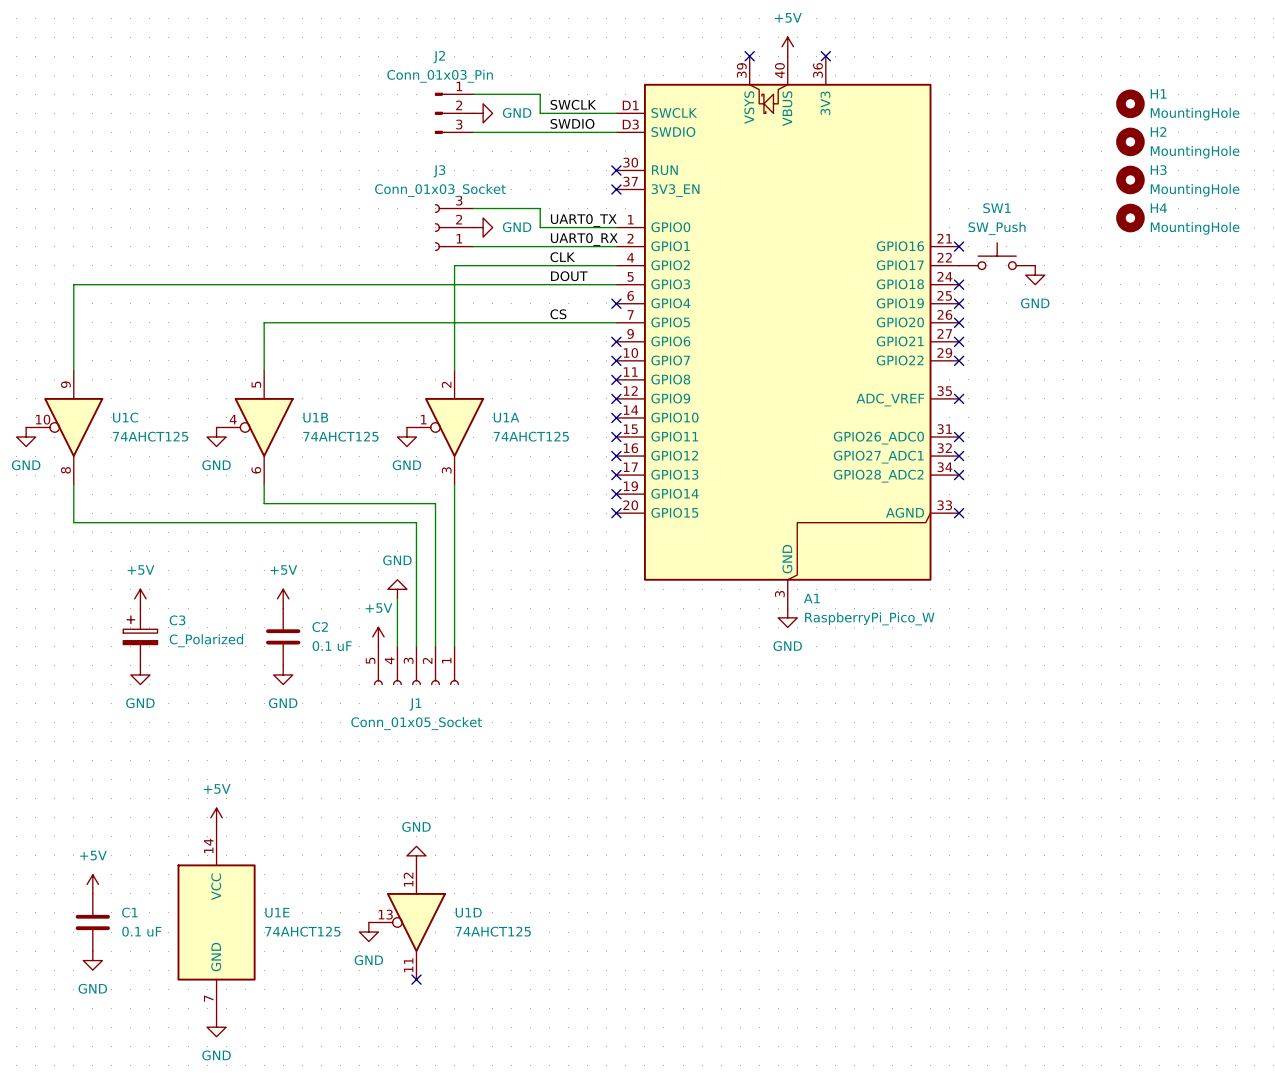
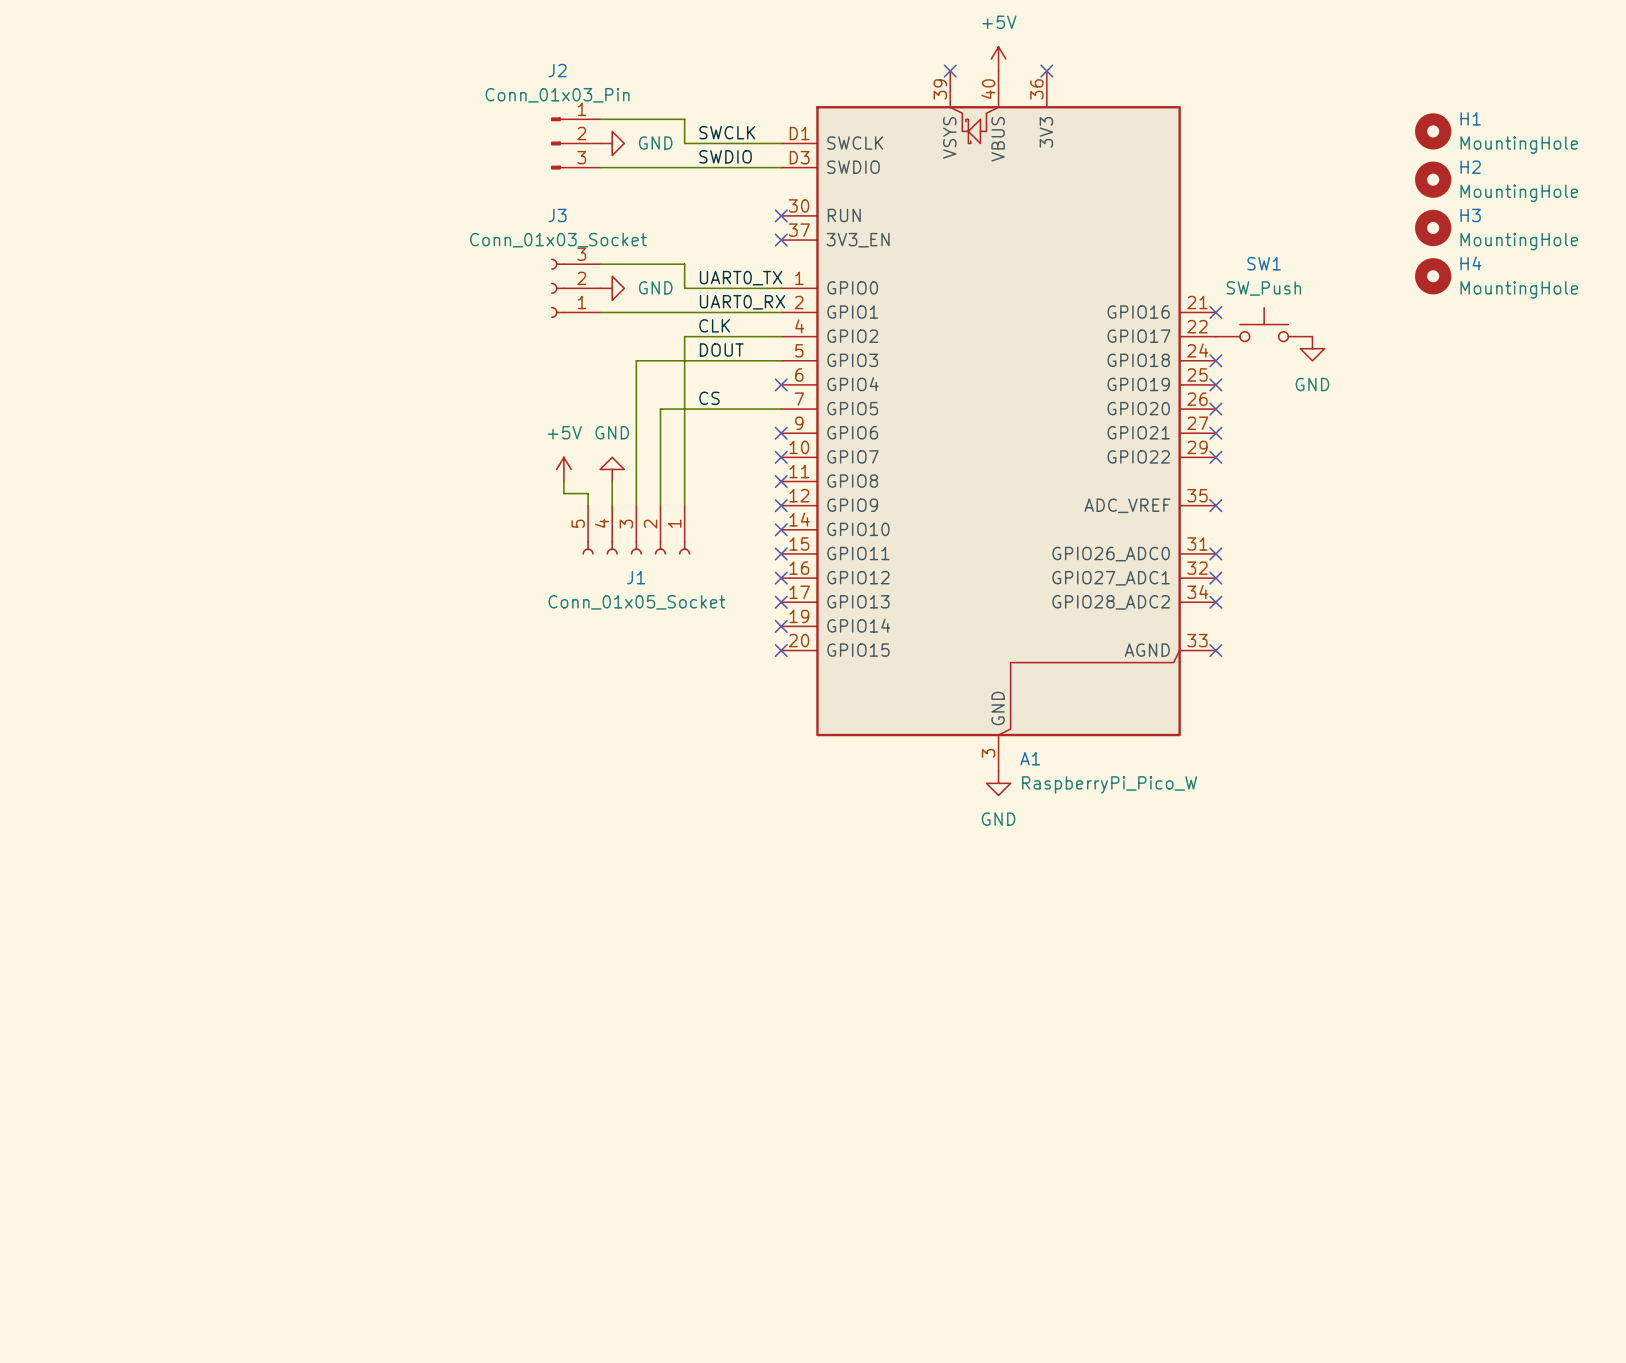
wire: (540, 265) (454, 265) (454, 370) -> (684, 336) (684, 505)
wire: (502, 284) (73, 284) (73, 370) -> (636, 360) (636, 505)
wire: (521, 322) (264, 322) (264, 370) -> (660, 409) (660, 505)
power symbol: none -> +5V (563, 469)
wire: none -> (563, 481) (563, 493) (588, 493) (588, 505)
wire: none -> (612, 481) (612, 505)
U1C: 74AHCT125 (64, 427) -> none
U1B: 74AHCT125 (255, 427) -> none
U1A: 74AHCT125 (445, 427) -> none
power symbol: GND (26, 437) -> none
power symbol: GND (216, 437) -> none
power symbol rotation: 0° (406, 437) -> 180° (612, 469)
power symbol position: GND (406, 437) -> GND (612, 469)
wire: (73, 484) (73, 522) (416, 522) (416, 646) -> none
wire: (264, 484) (264, 503) (435, 503) (435, 646) -> none
wire: (454, 484) (454, 646) -> none
power symbol: GND (397, 589) -> none
power symbol: +5V (140, 598) -> none
power symbol: +5V (283, 598) -> none
wire: (397, 598) (397, 646) -> none
C3: C_Polarized (140, 636) -> none
C2: 0.1 uF (283, 636) -> none
power symbol: +5V (378, 636) -> none
J1 position: (416, 665) -> (636, 530)
power symbol: GND (140, 674) -> none
power symbol: GND (283, 674) -> none
power symbol: +5V (216, 817) -> none
power symbol: GND (416, 855) -> none
power symbol: +5V (92, 884) -> none
C1: 0.1 uF (92, 922) -> none
U1E: 74AHCT125 (216, 922) -> none
U1D: 74AHCT125 (407, 922) -> none
power symbol: GND (368, 932) -> none
power symbol: GND (92, 960) -> none
no-connect mark: (416, 979) -> none
power symbol: GND (216, 1027) -> none

